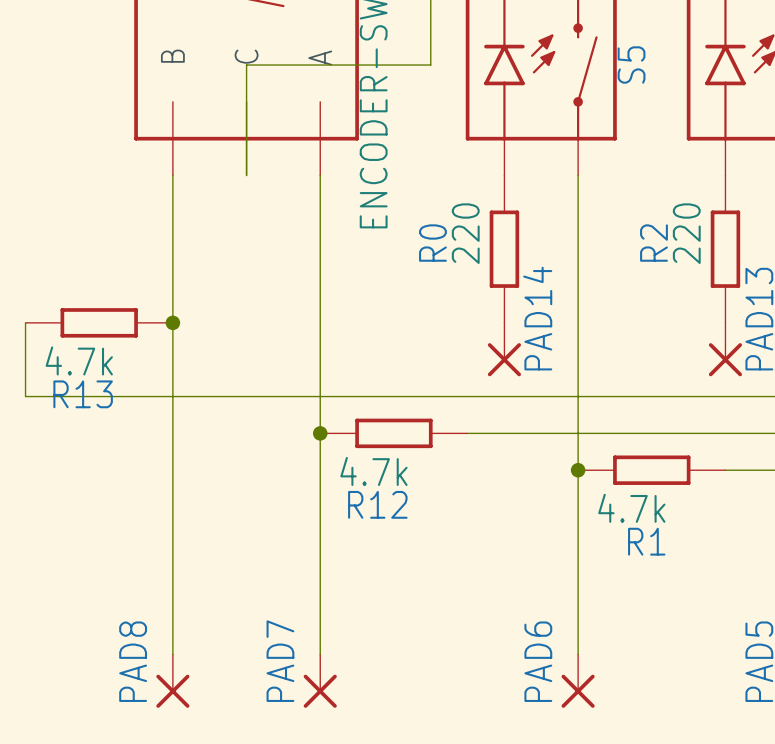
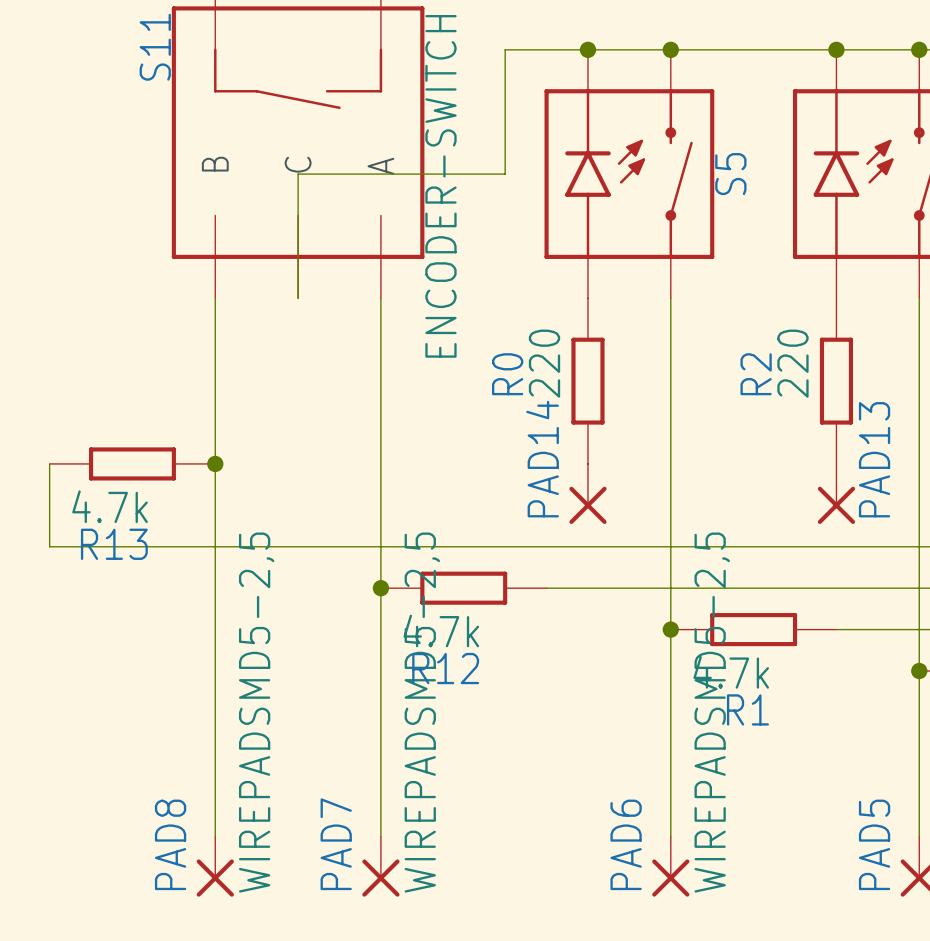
PAD14 name position: PAD14 (537, 318) -> PAD14 (542, 459)
PAD8 value: none -> WIREPADSMD5-2,5 (256, 712)
PAD7 value: none -> WIREPADSMD5-2,5 (422, 712)
PAD6 value: none -> WIREPADSMD5-2,5 (712, 712)

